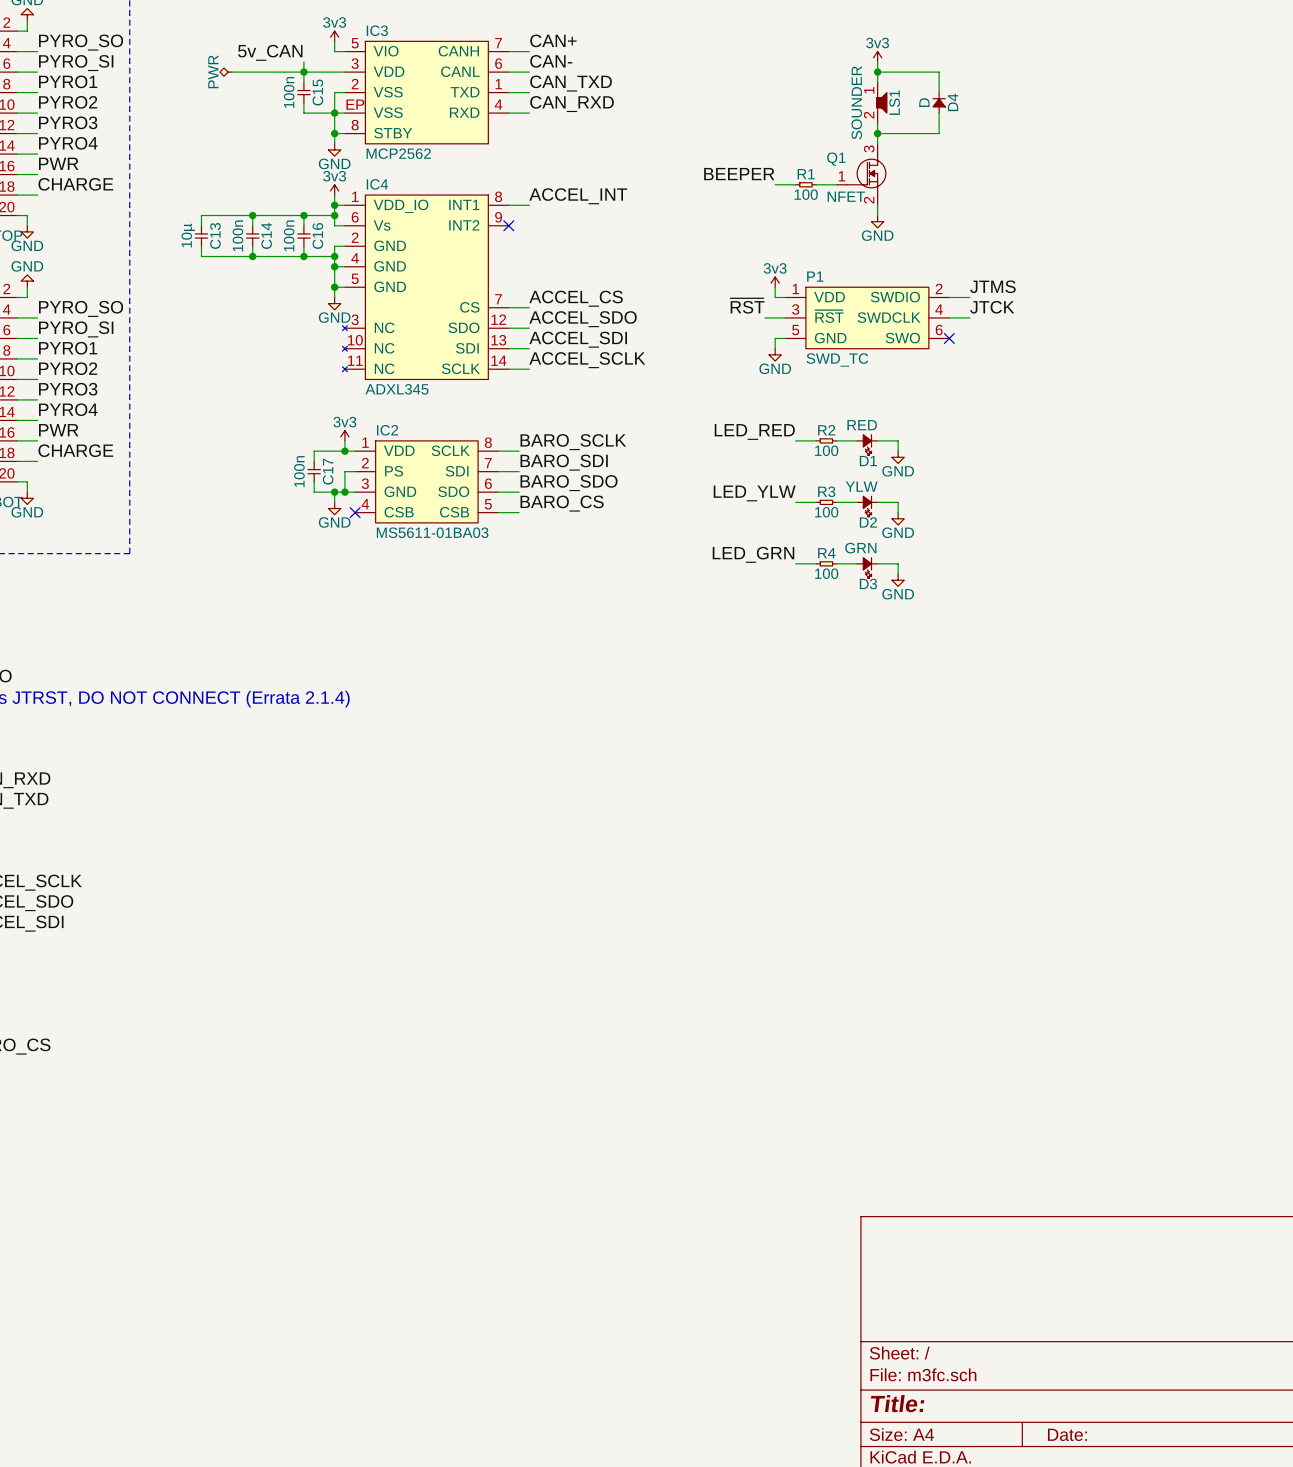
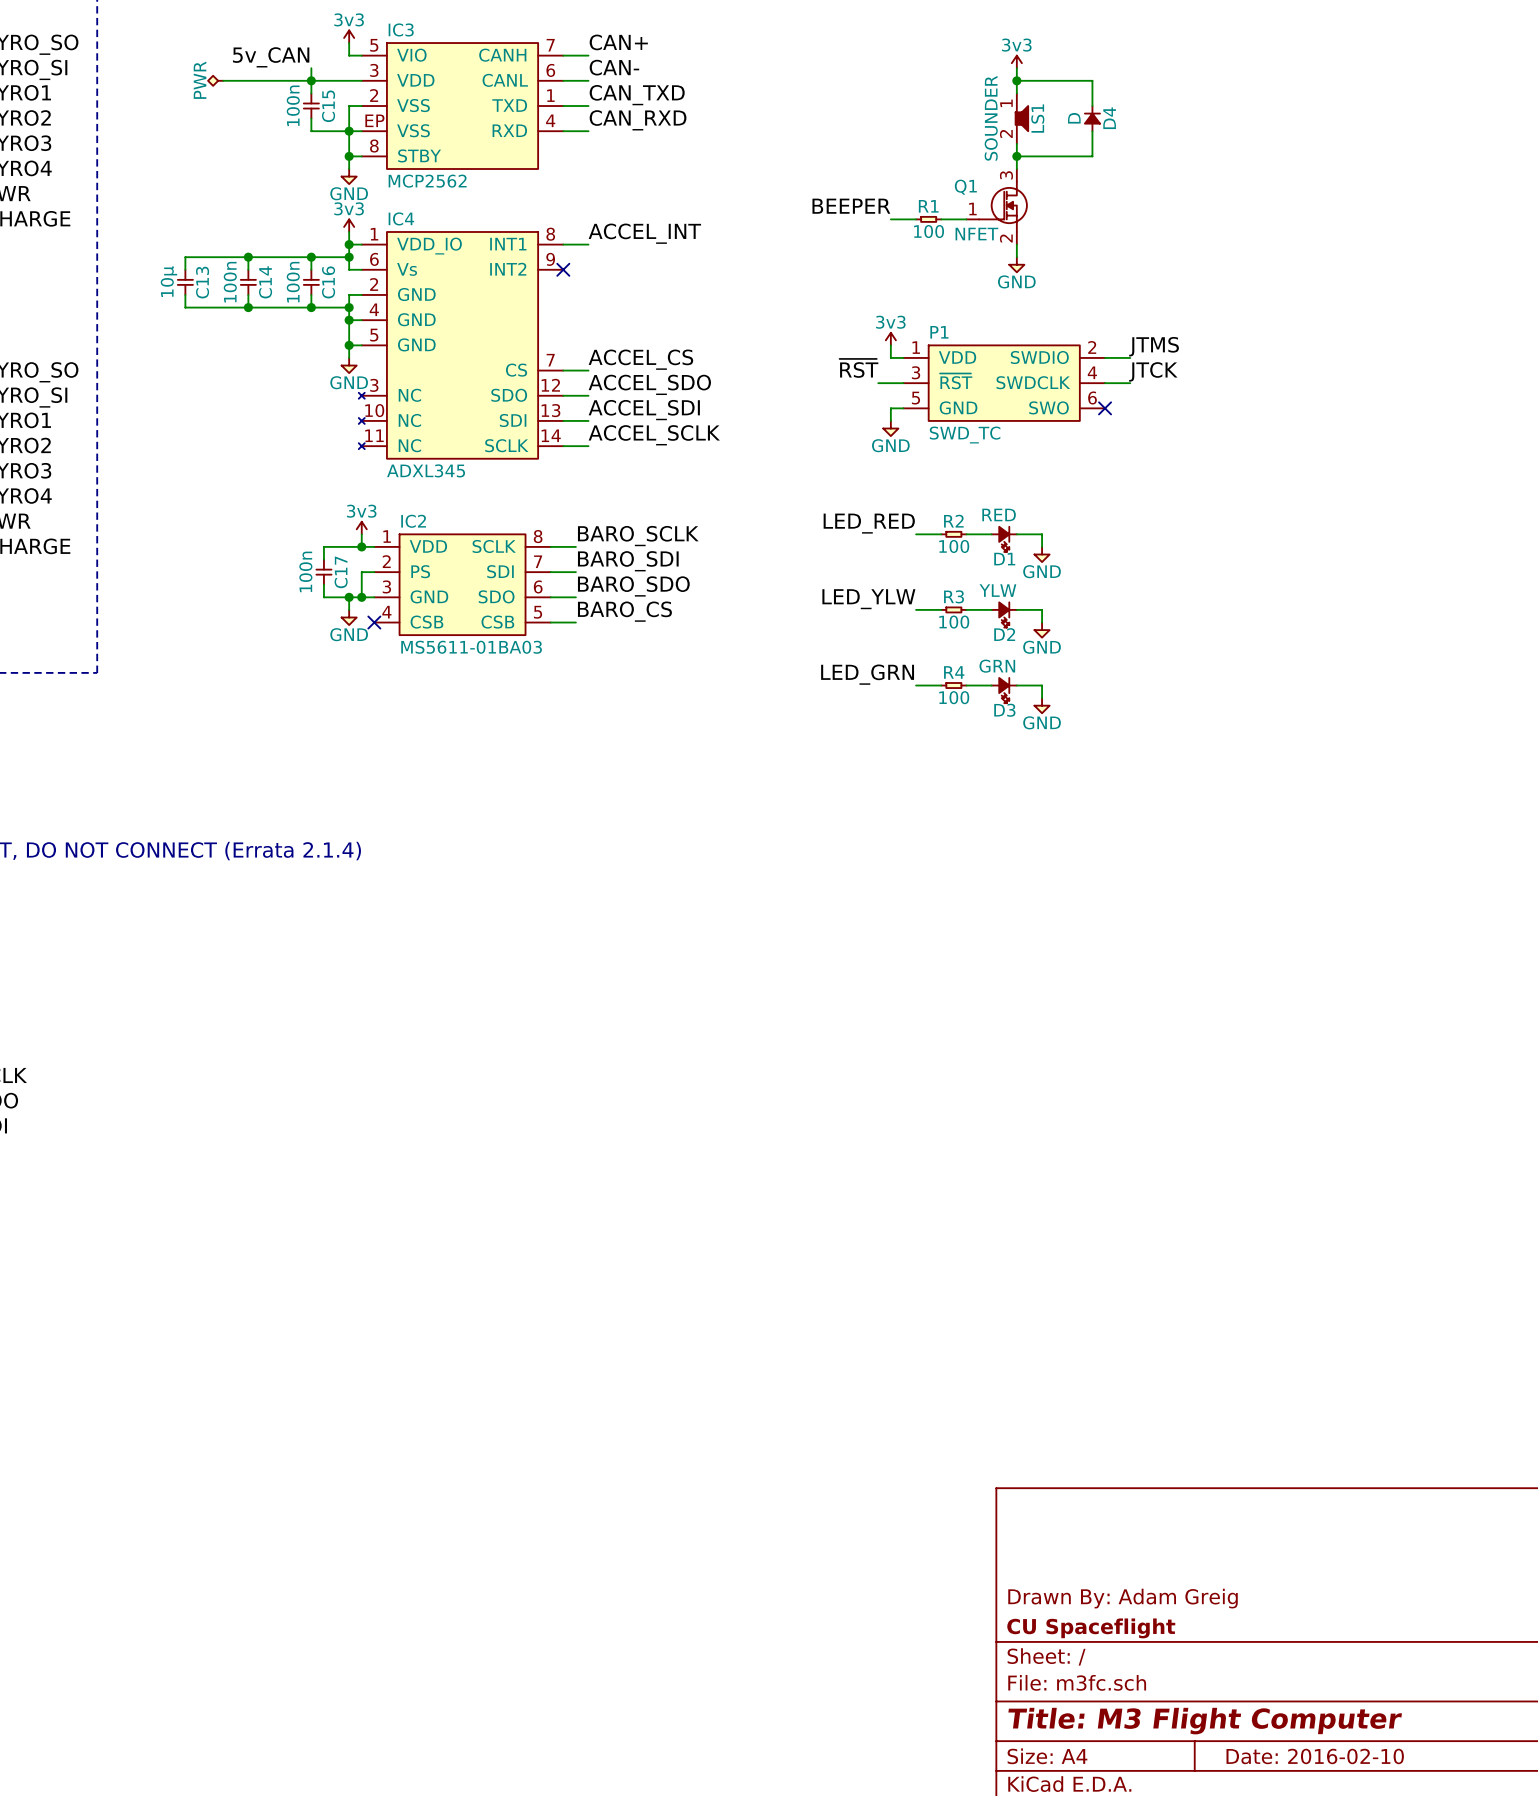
title block: none -> Drawn By: Adam Greig (1123, 1598)
title block: none -> CU Spaceflight (1091, 1628)
title block: Title: (897, 1403) -> Title: M3 Flight Computer (1205, 1721)
title block: Date: (1067, 1434) -> Date: 2016-02-10 (1315, 1756)

